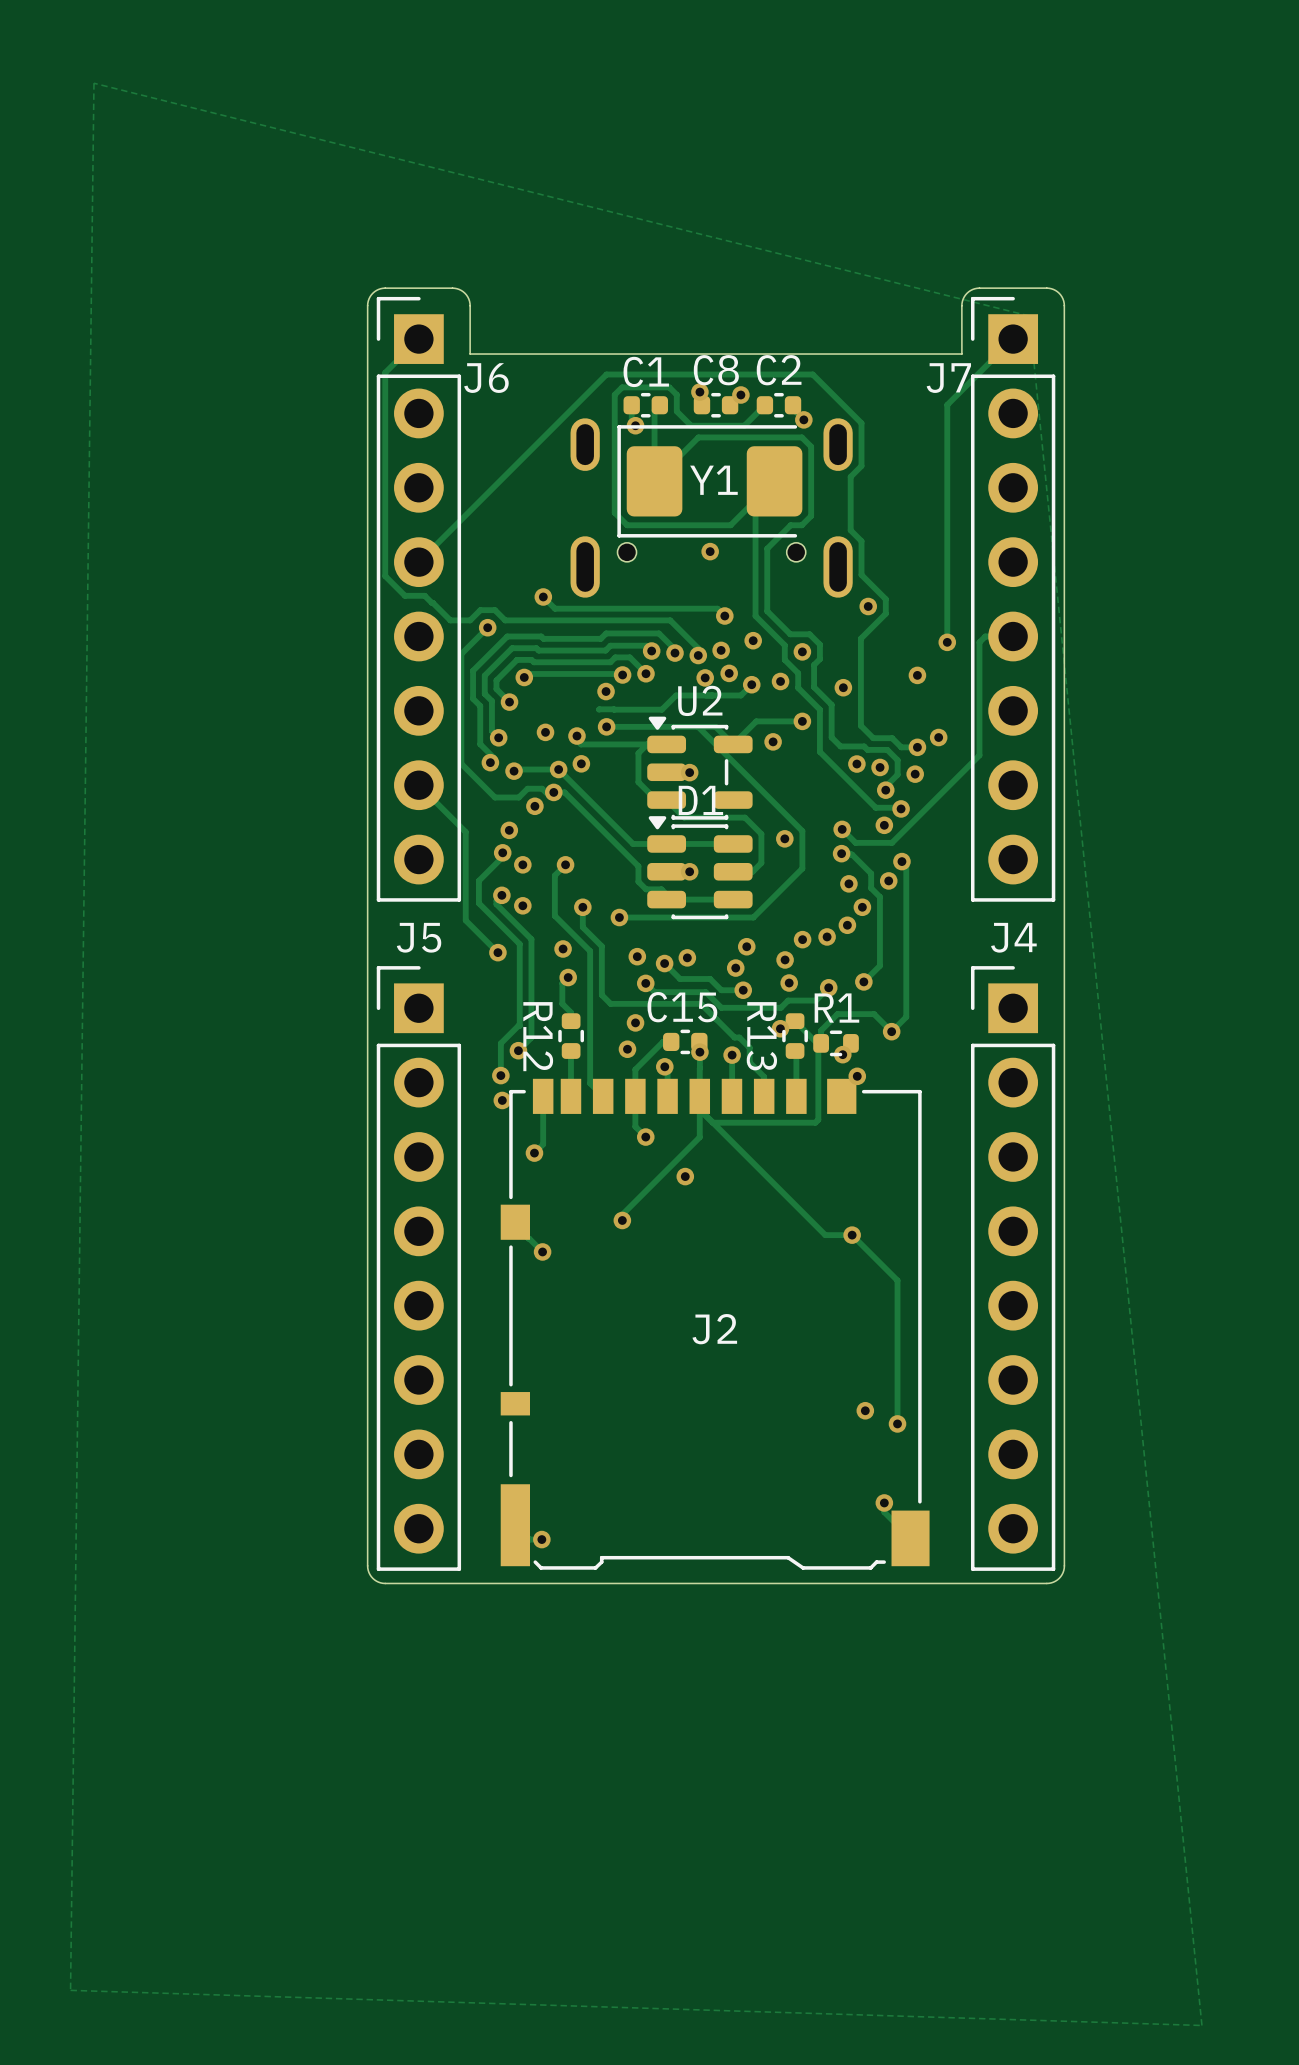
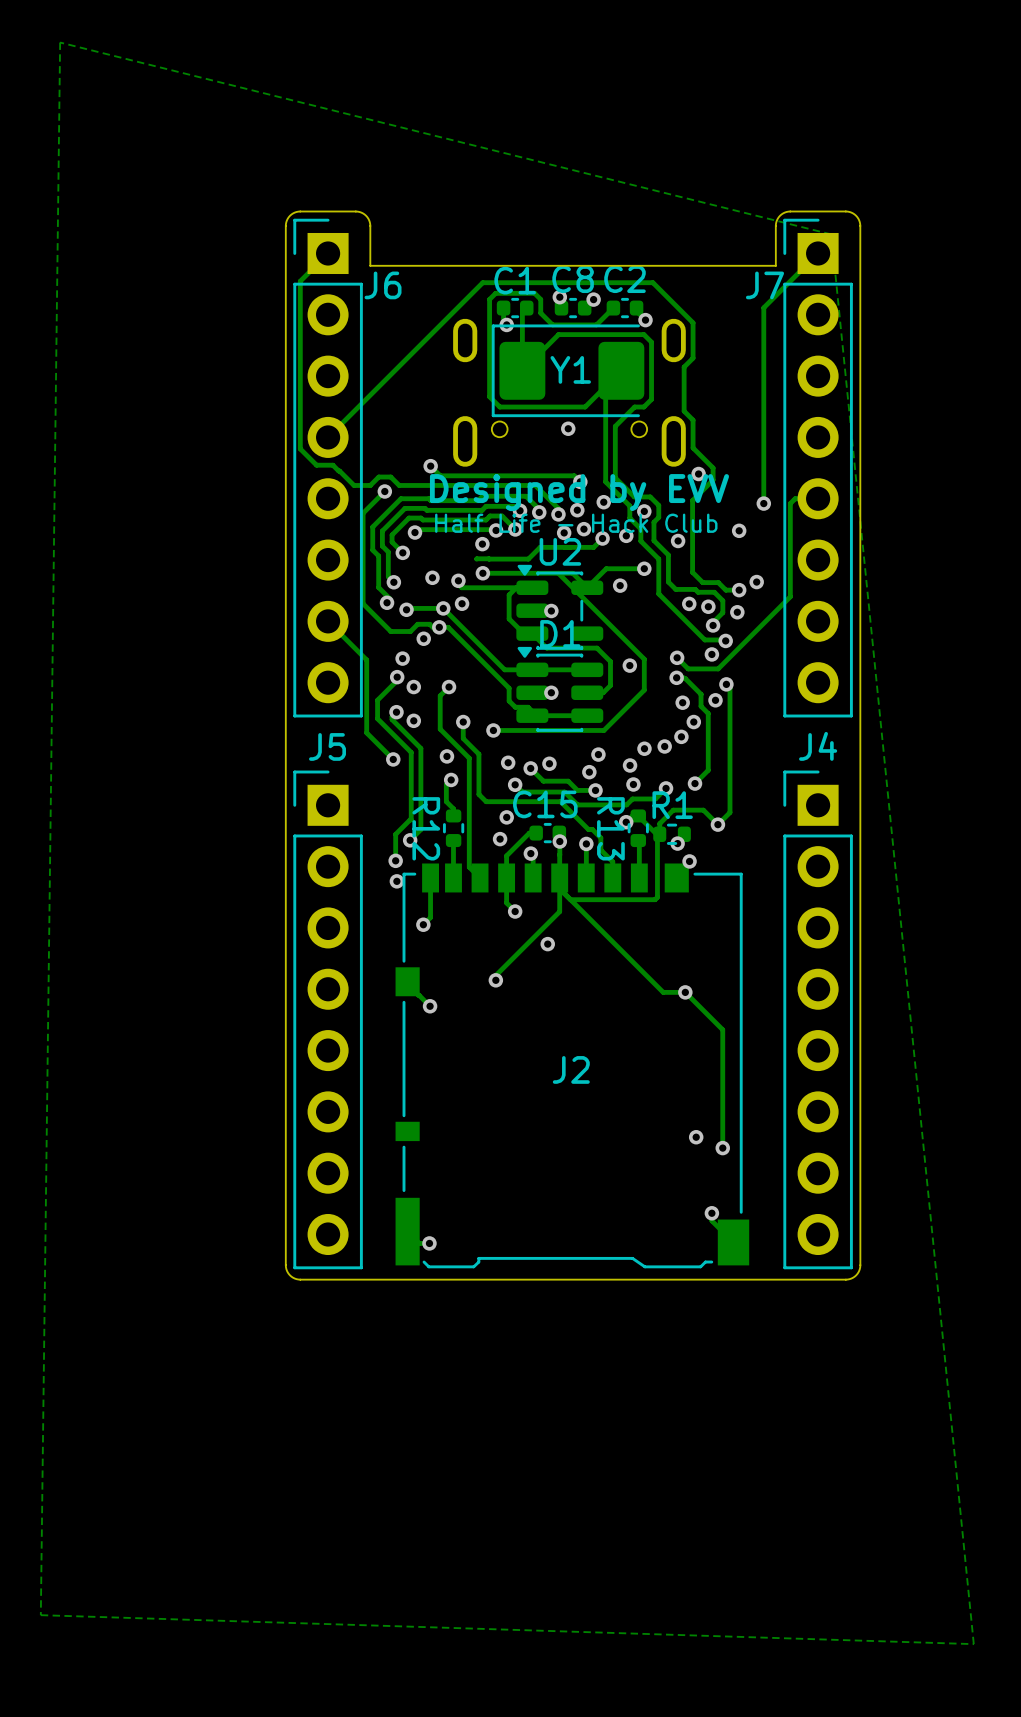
text: none -> Designed by EVV (579, 492)
text: none -> Half Life - Hack Club (576, 523)

